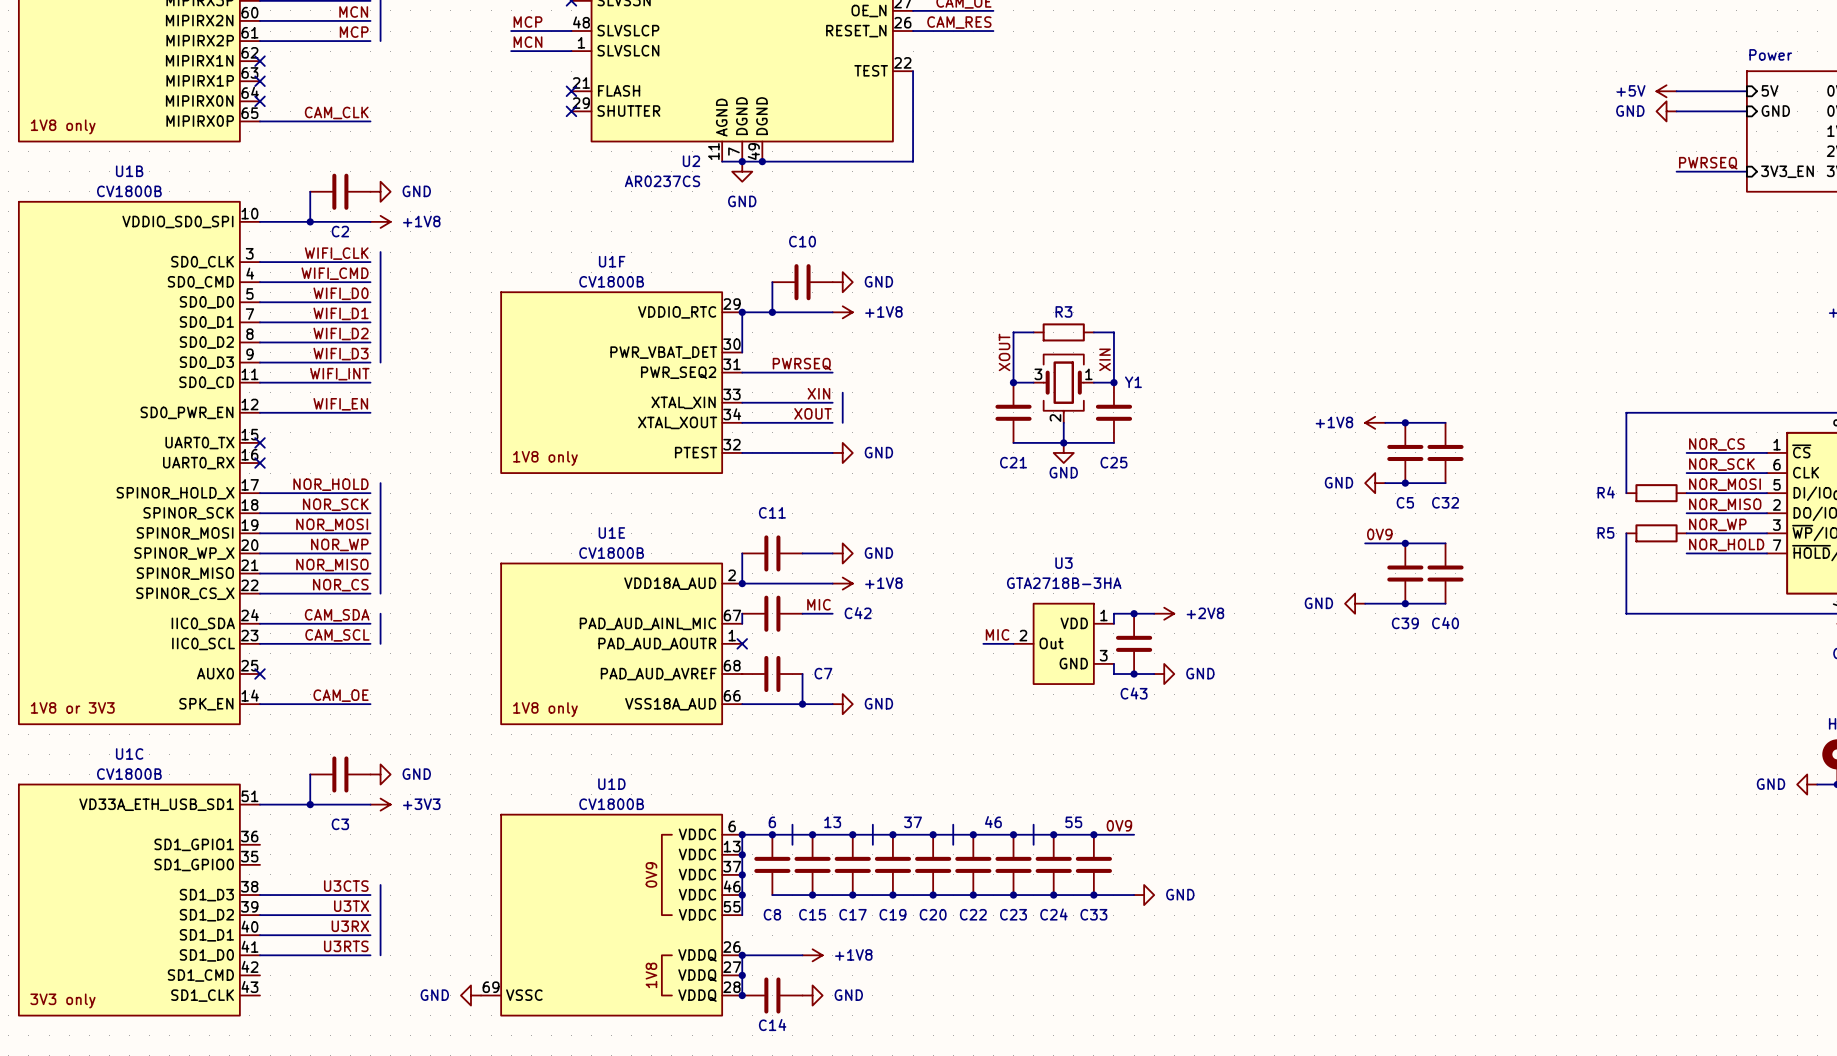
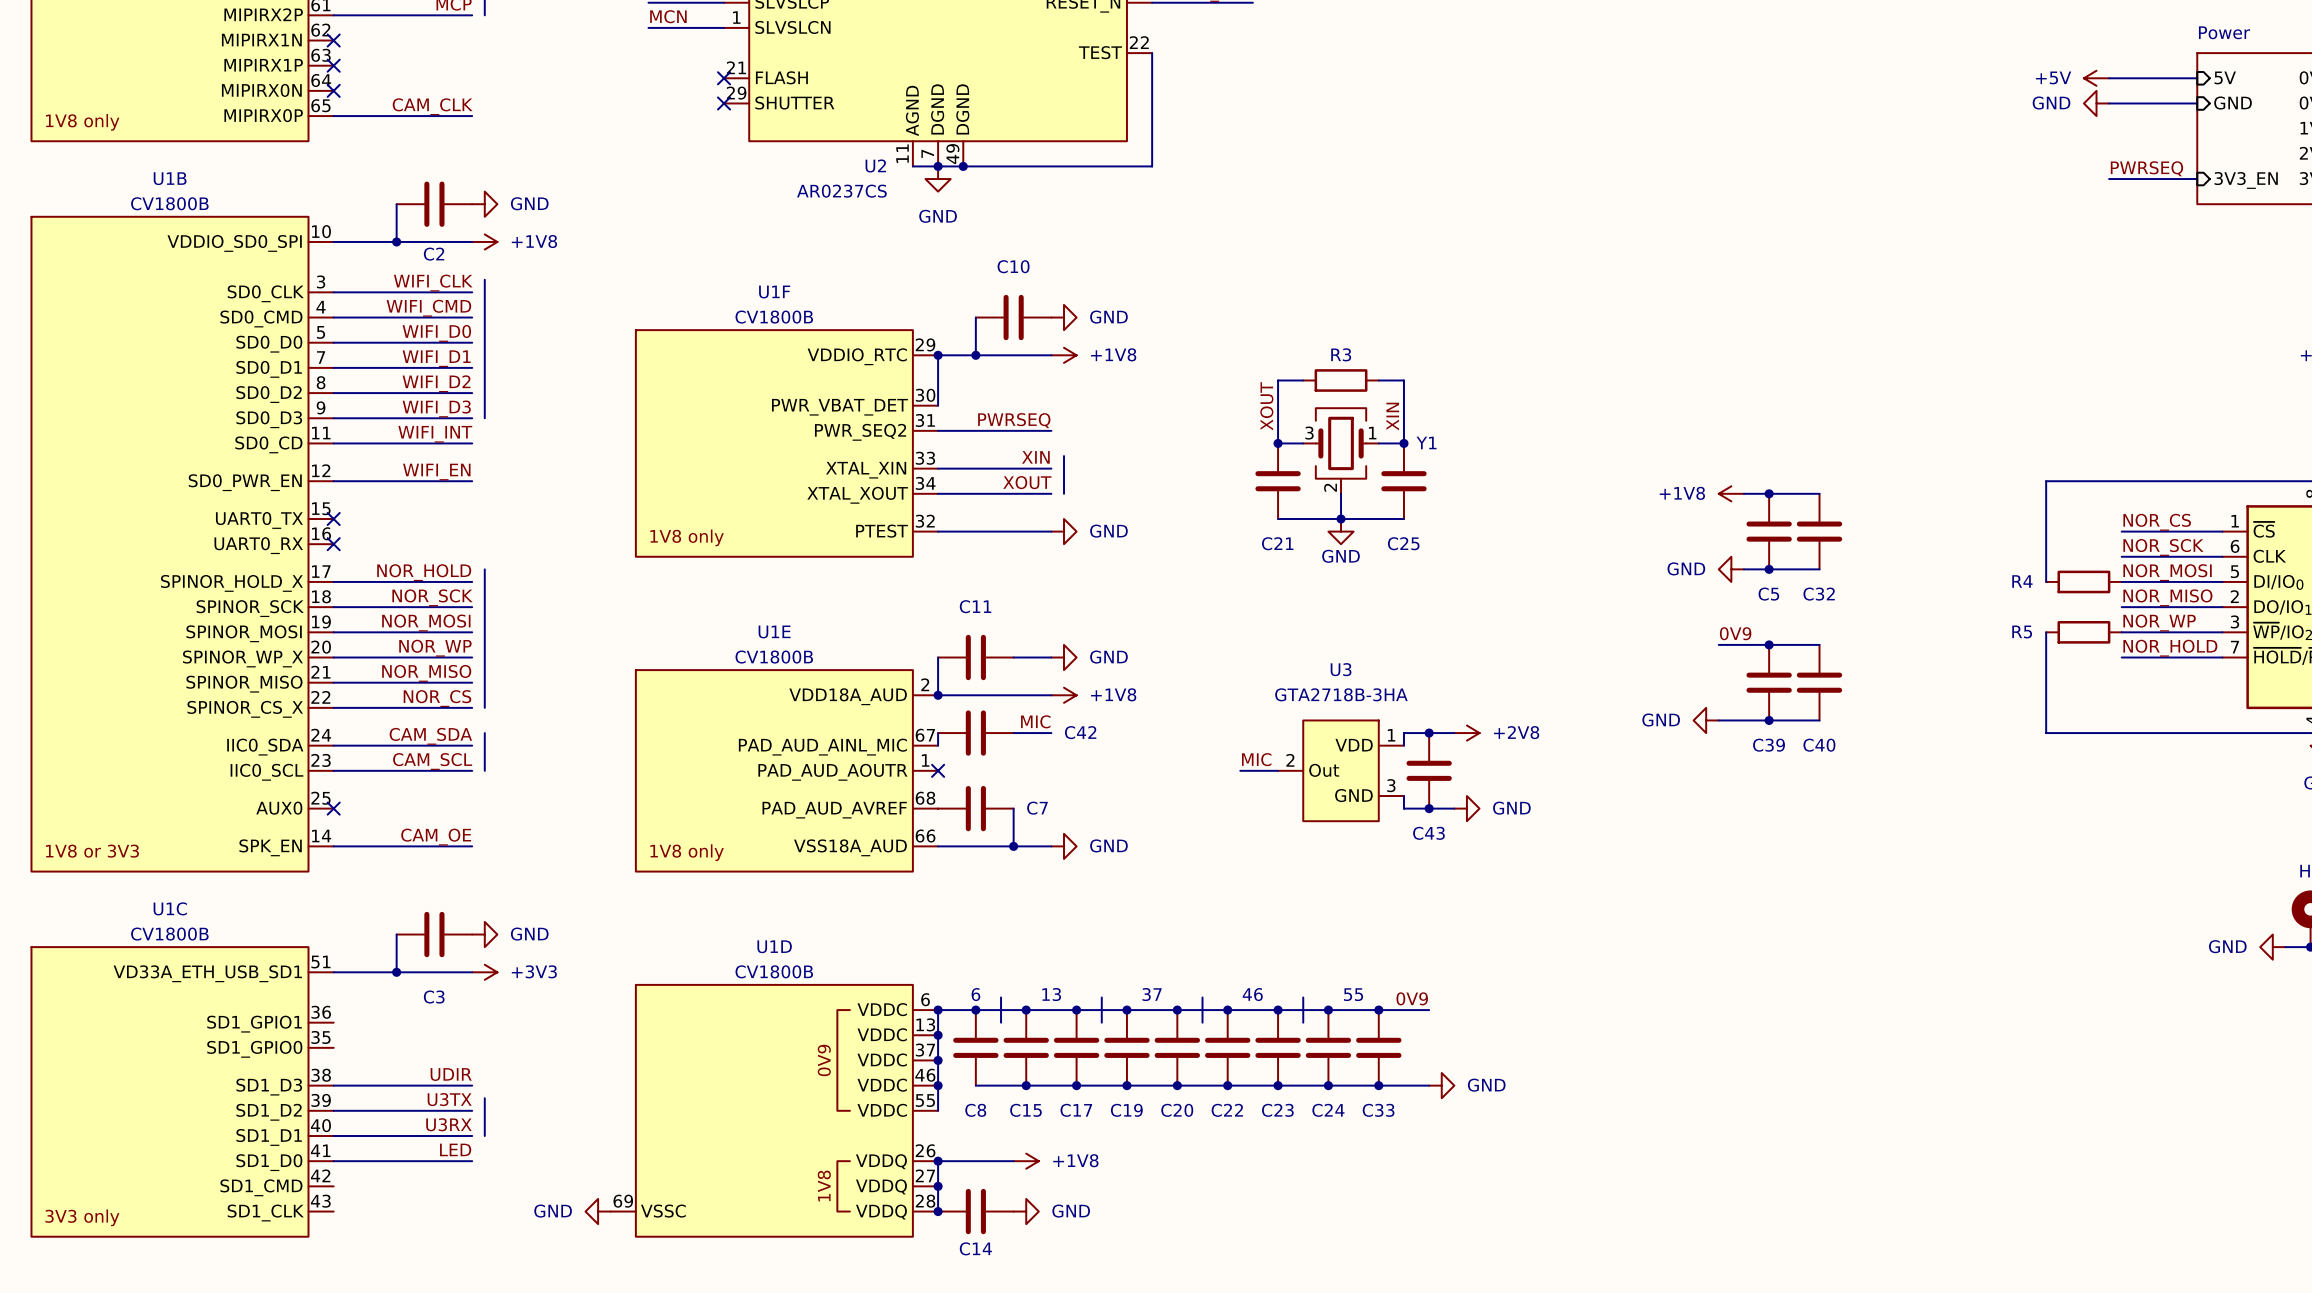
line: (380, 884) (380, 905) -> none
label: U3CTS (346, 886) -> UDIR (451, 1074)
line: (380, 935) (380, 955) -> none
label: U3RTS (346, 946) -> LED (455, 1149)

